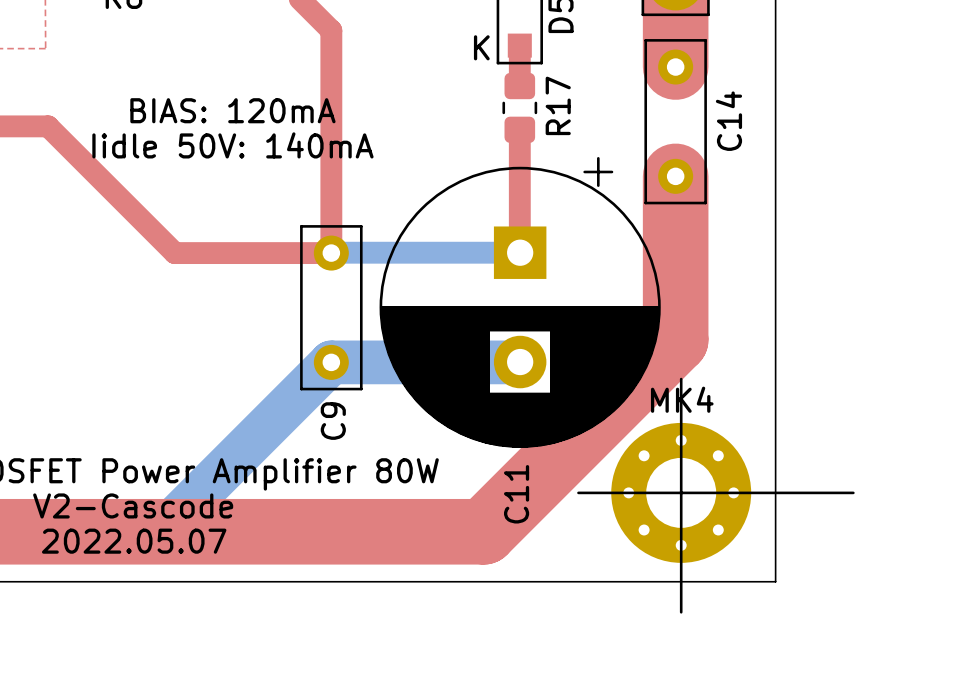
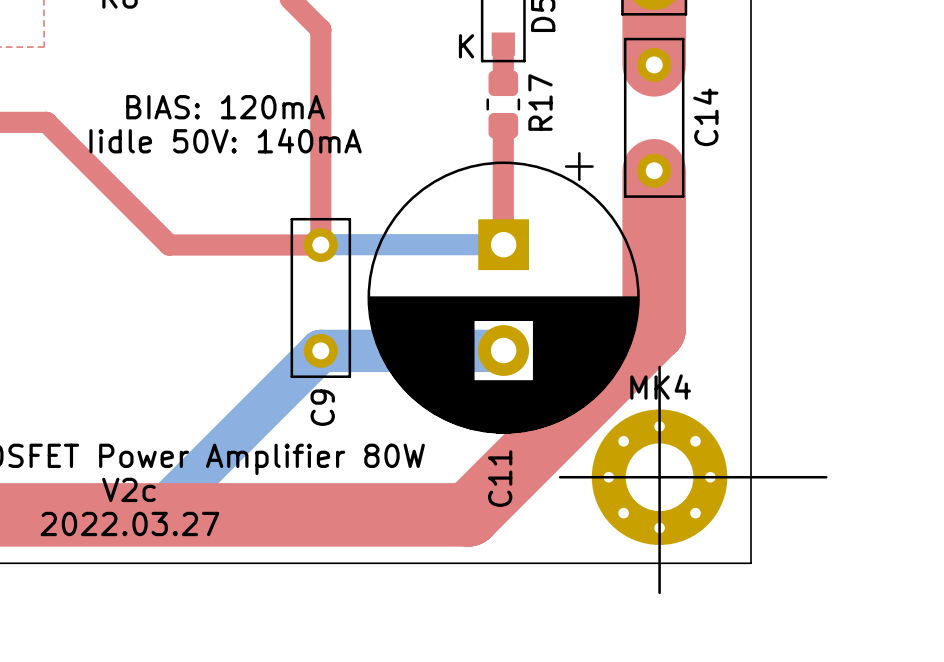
text: V2-Cascode (133, 505) -> V2c (128, 489)
text: 2022.05.07 (134, 541) -> 2022.03.27 (129, 523)

